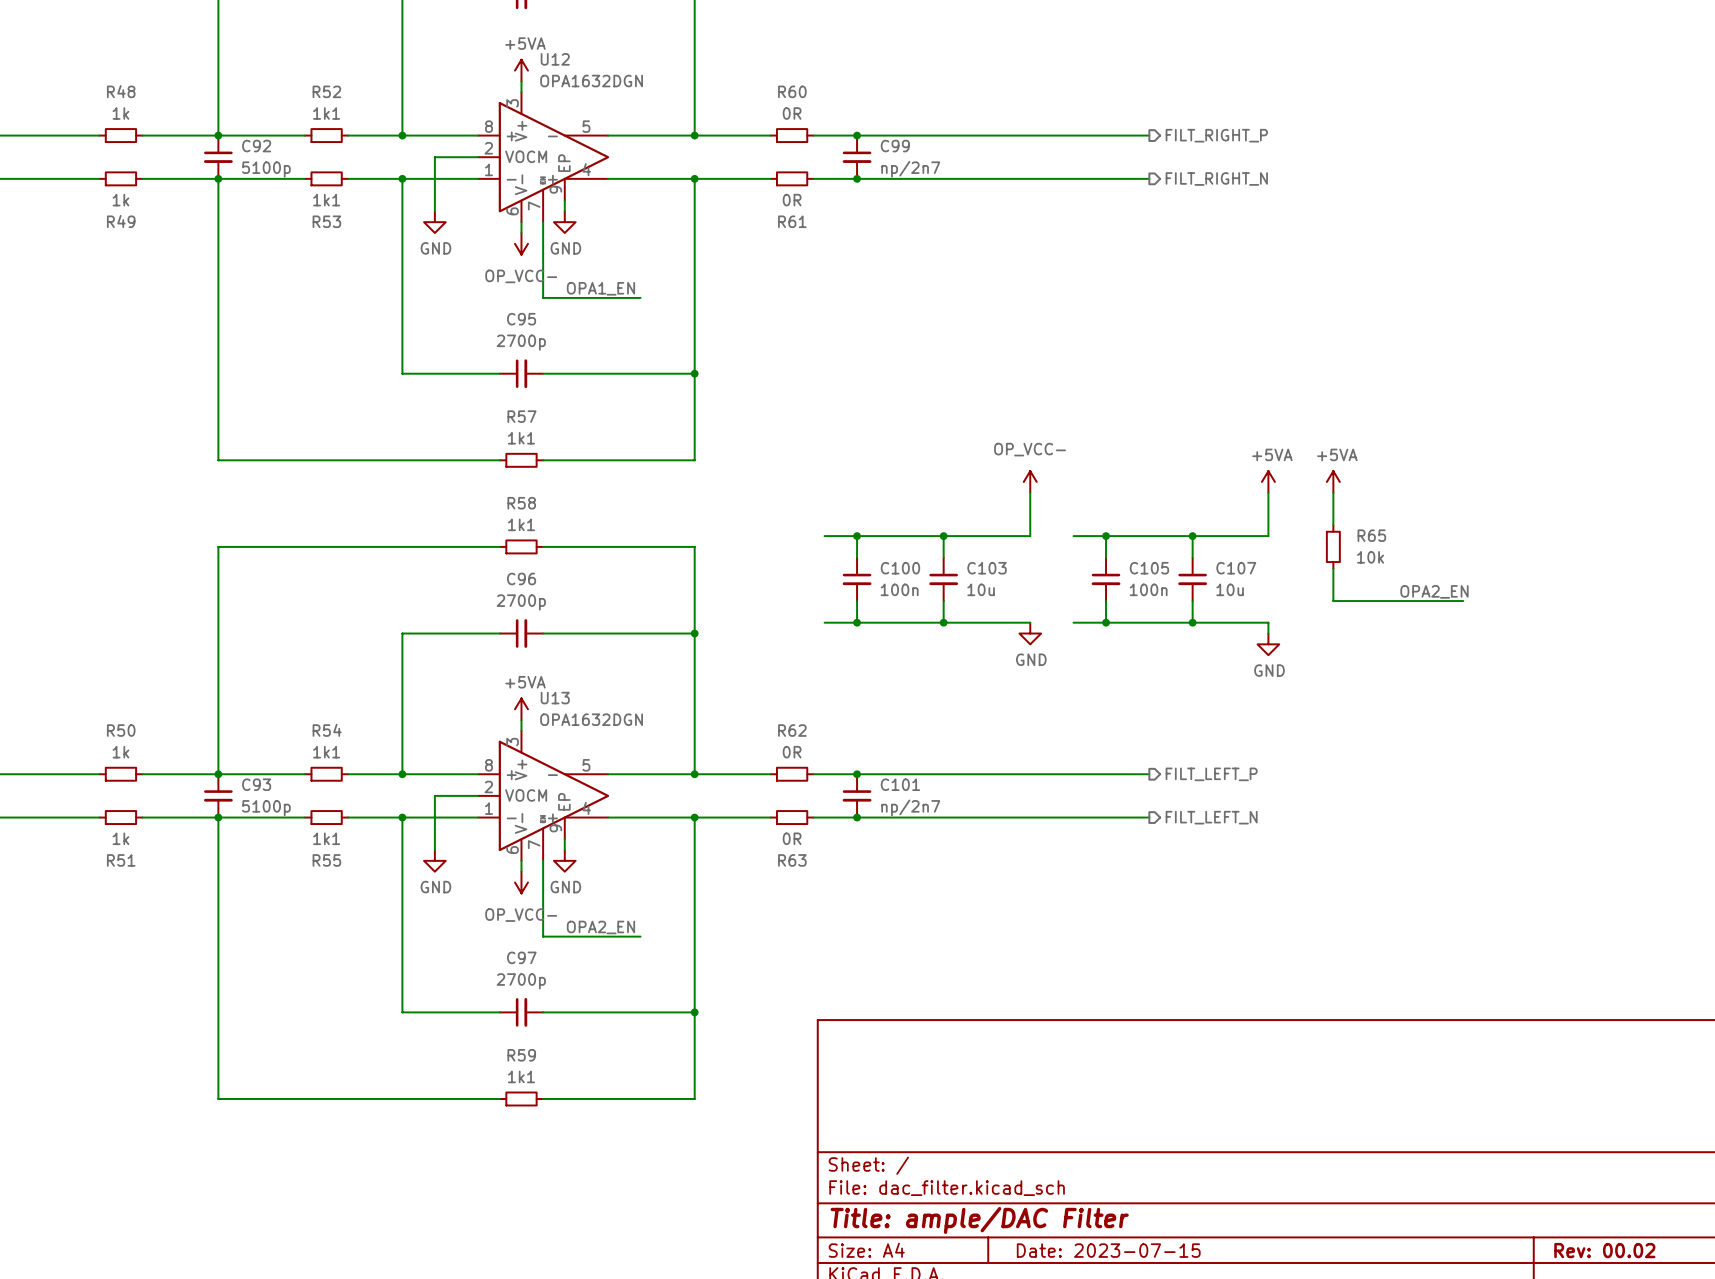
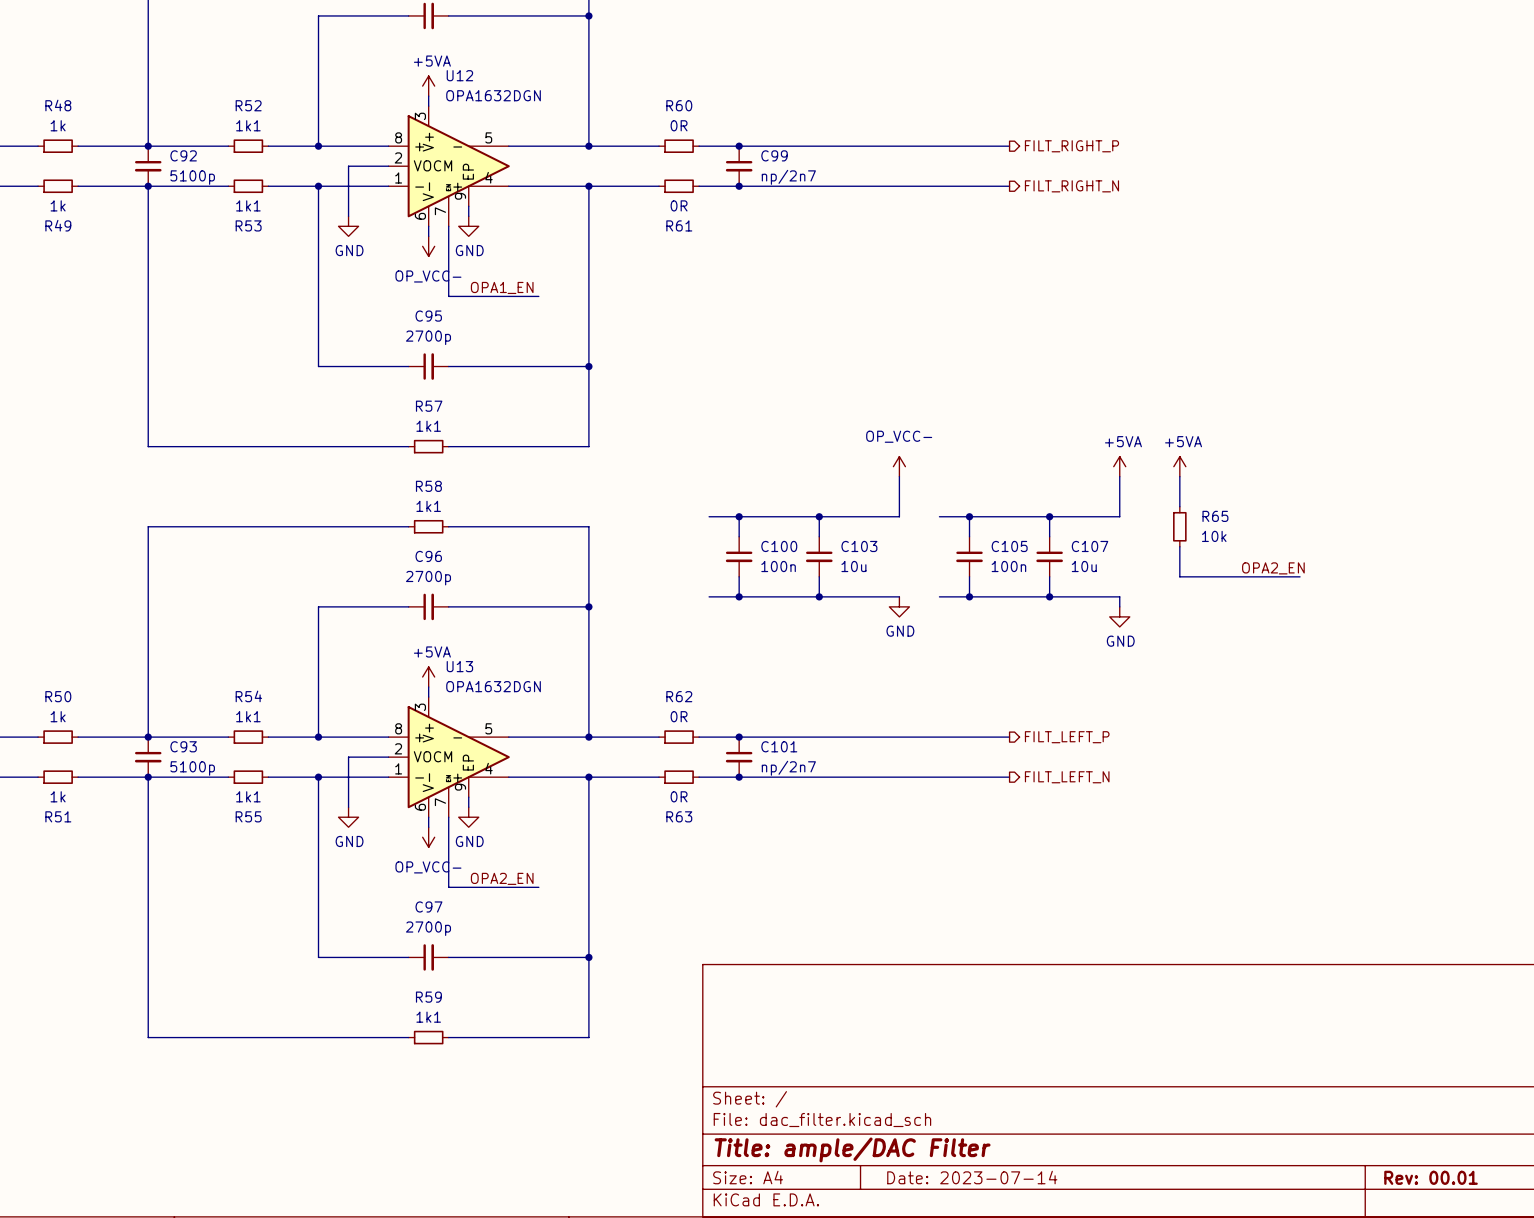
title block: Date: 2023-07-15 (1108, 1250) -> Date: 2023-07-14 (972, 1177)
title block: Rev: 00.02 (1604, 1250) -> Rev: 00.01 (1431, 1177)

